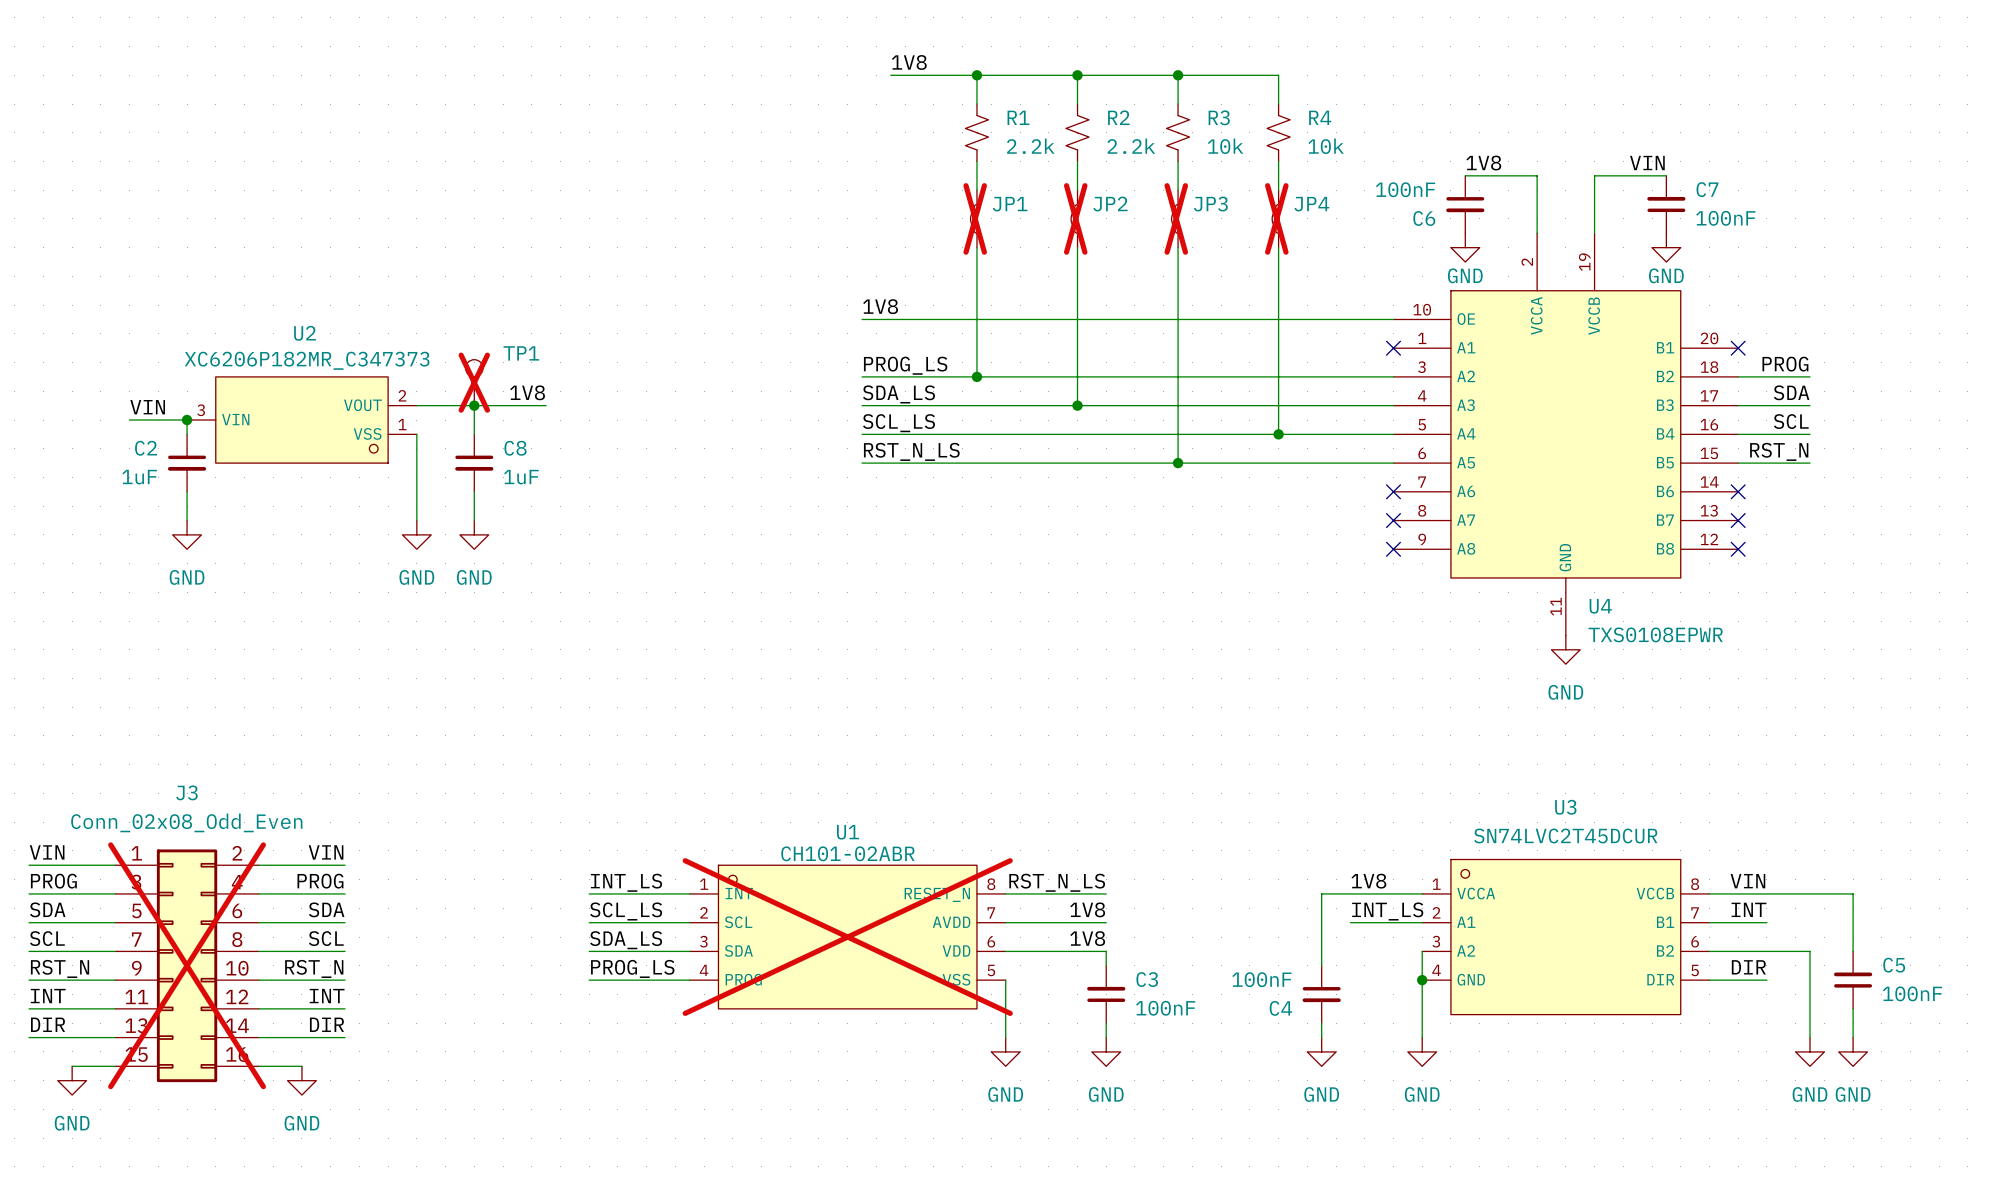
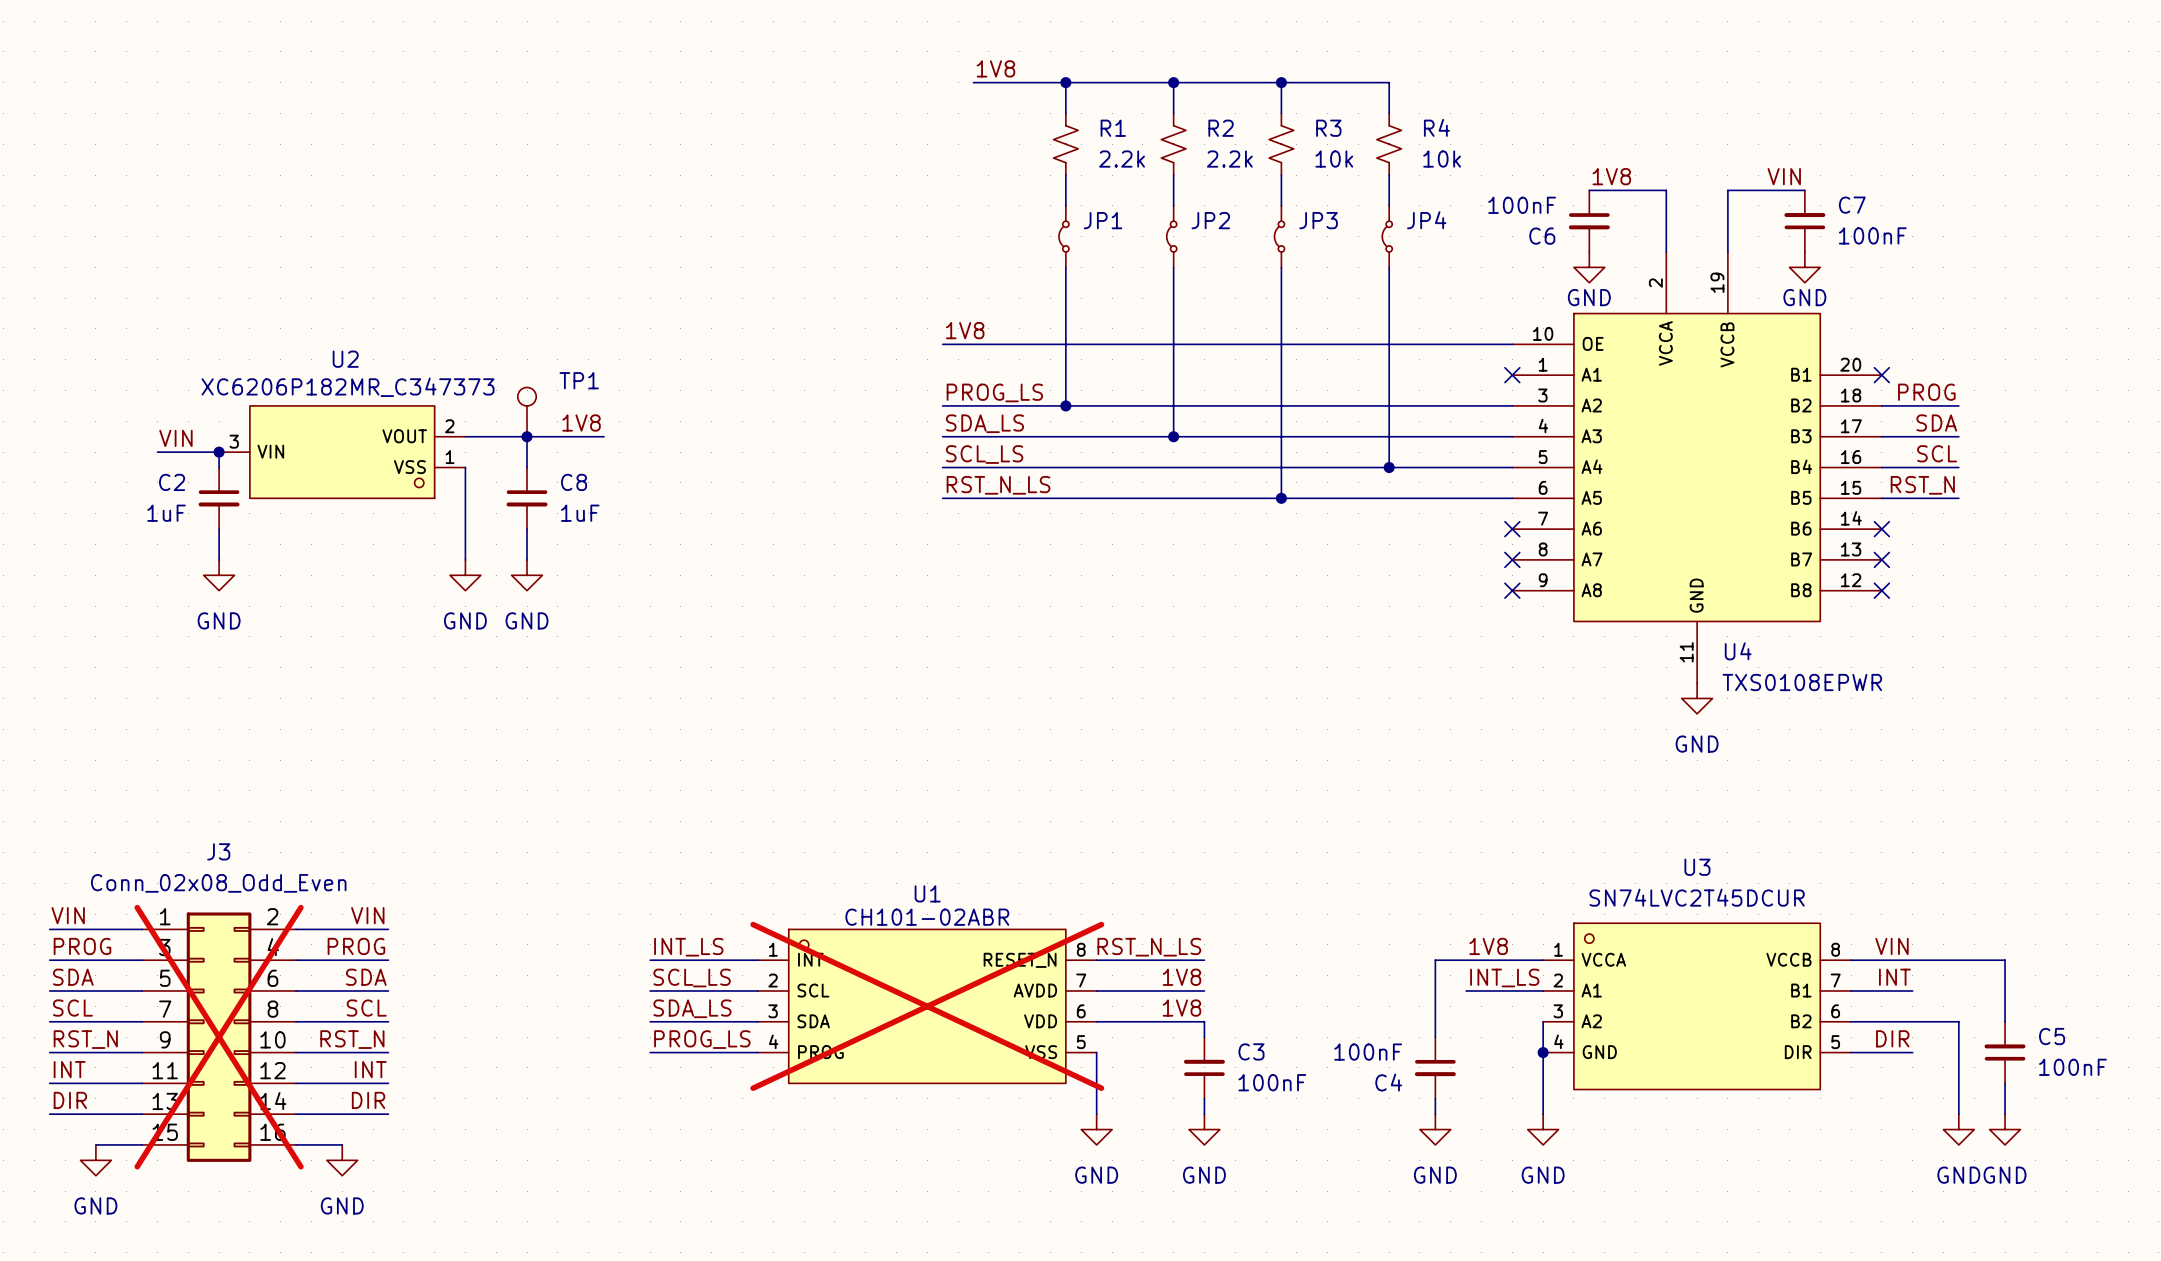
JP1 do-not-place cross: (975, 218) -> none
JP2 do-not-place cross: (1075, 218) -> none
JP3 do-not-place cross: (1176, 218) -> none
JP4 do-not-place cross: (1276, 218) -> none
TP1 do-not-place cross: (474, 382) -> none

